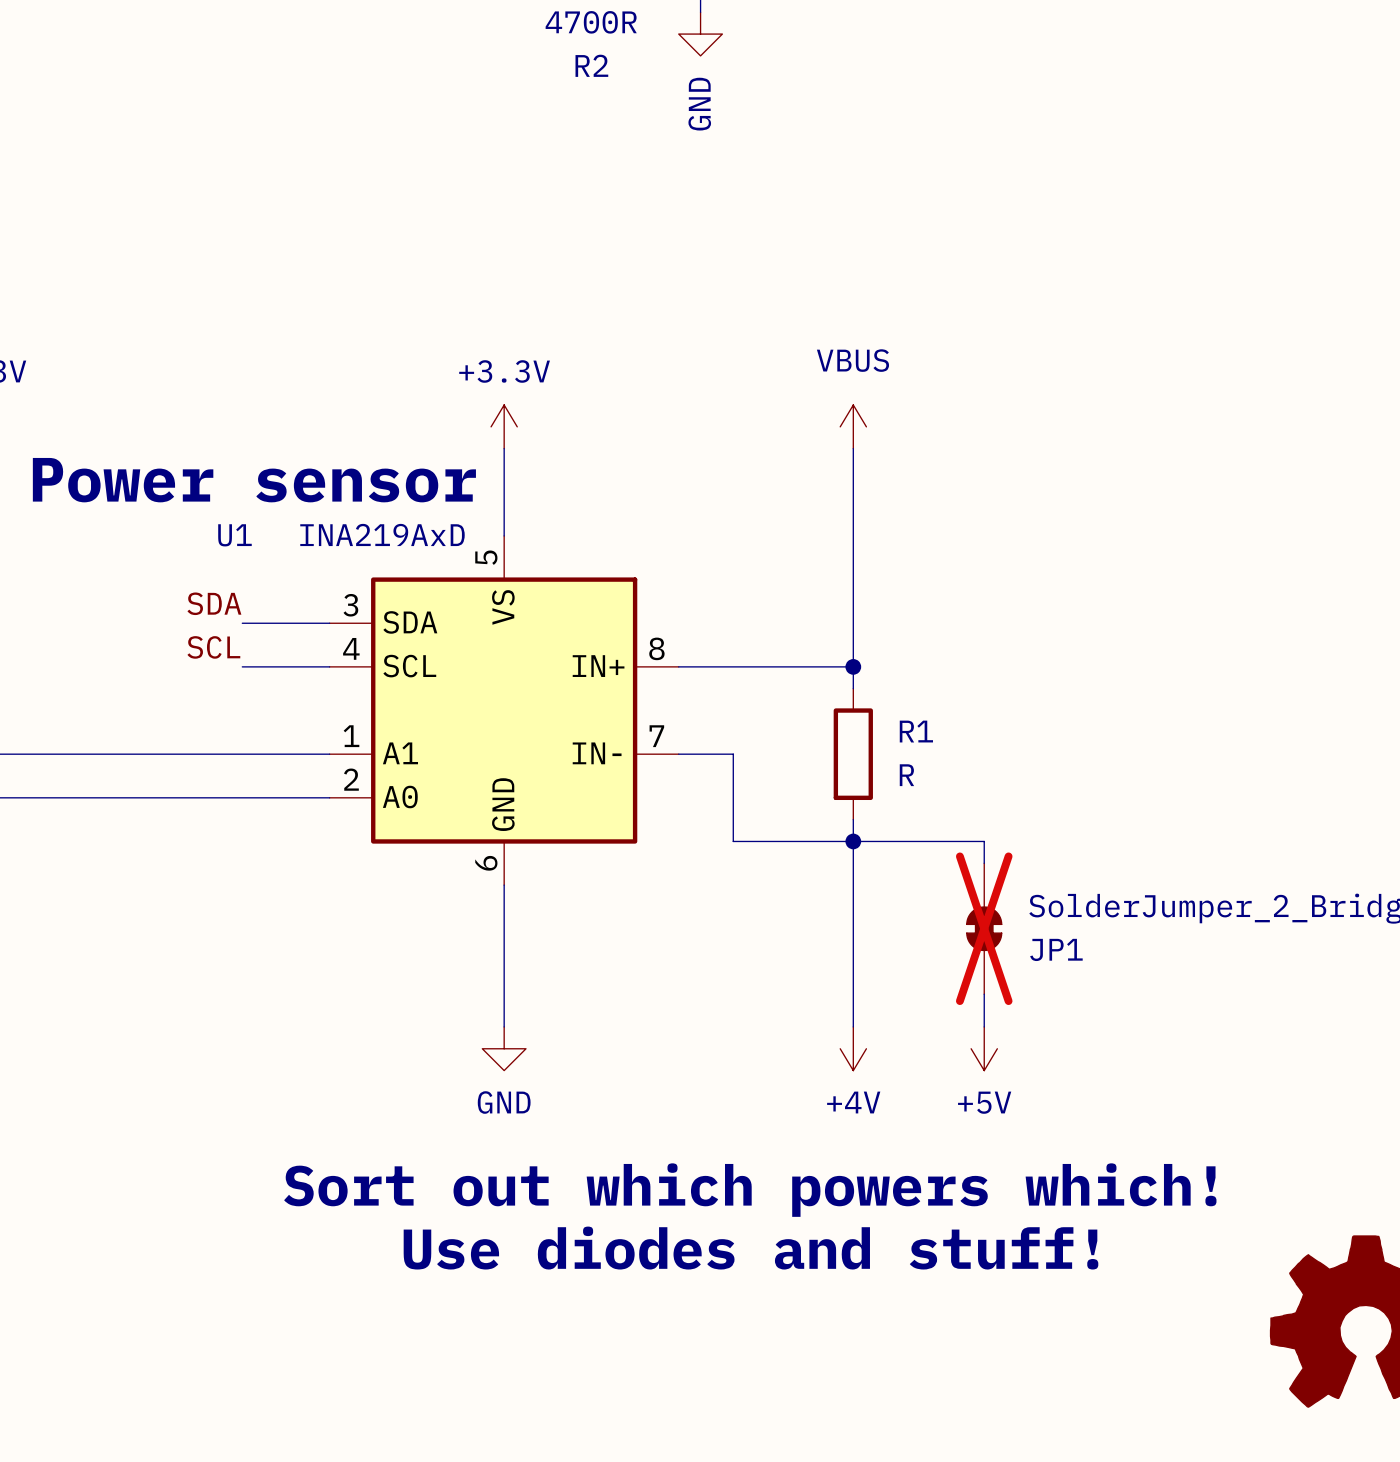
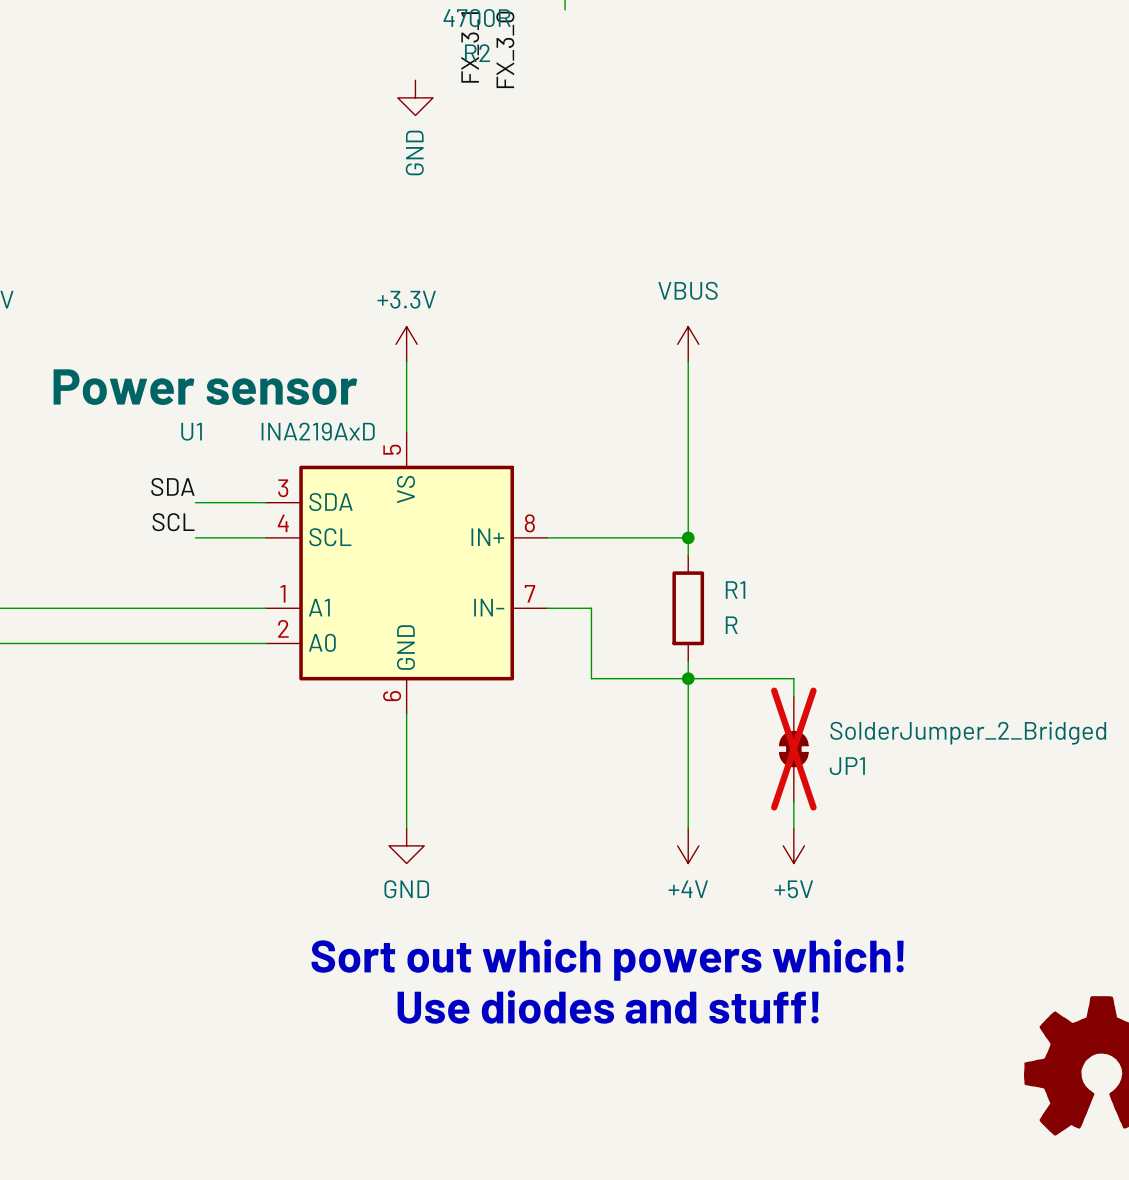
power symbol position: GND (700, 34) -> GND (415, 97)
label: none -> FX_3_1 (470, 47)
label: none -> FX_3_0 (505, 49)

